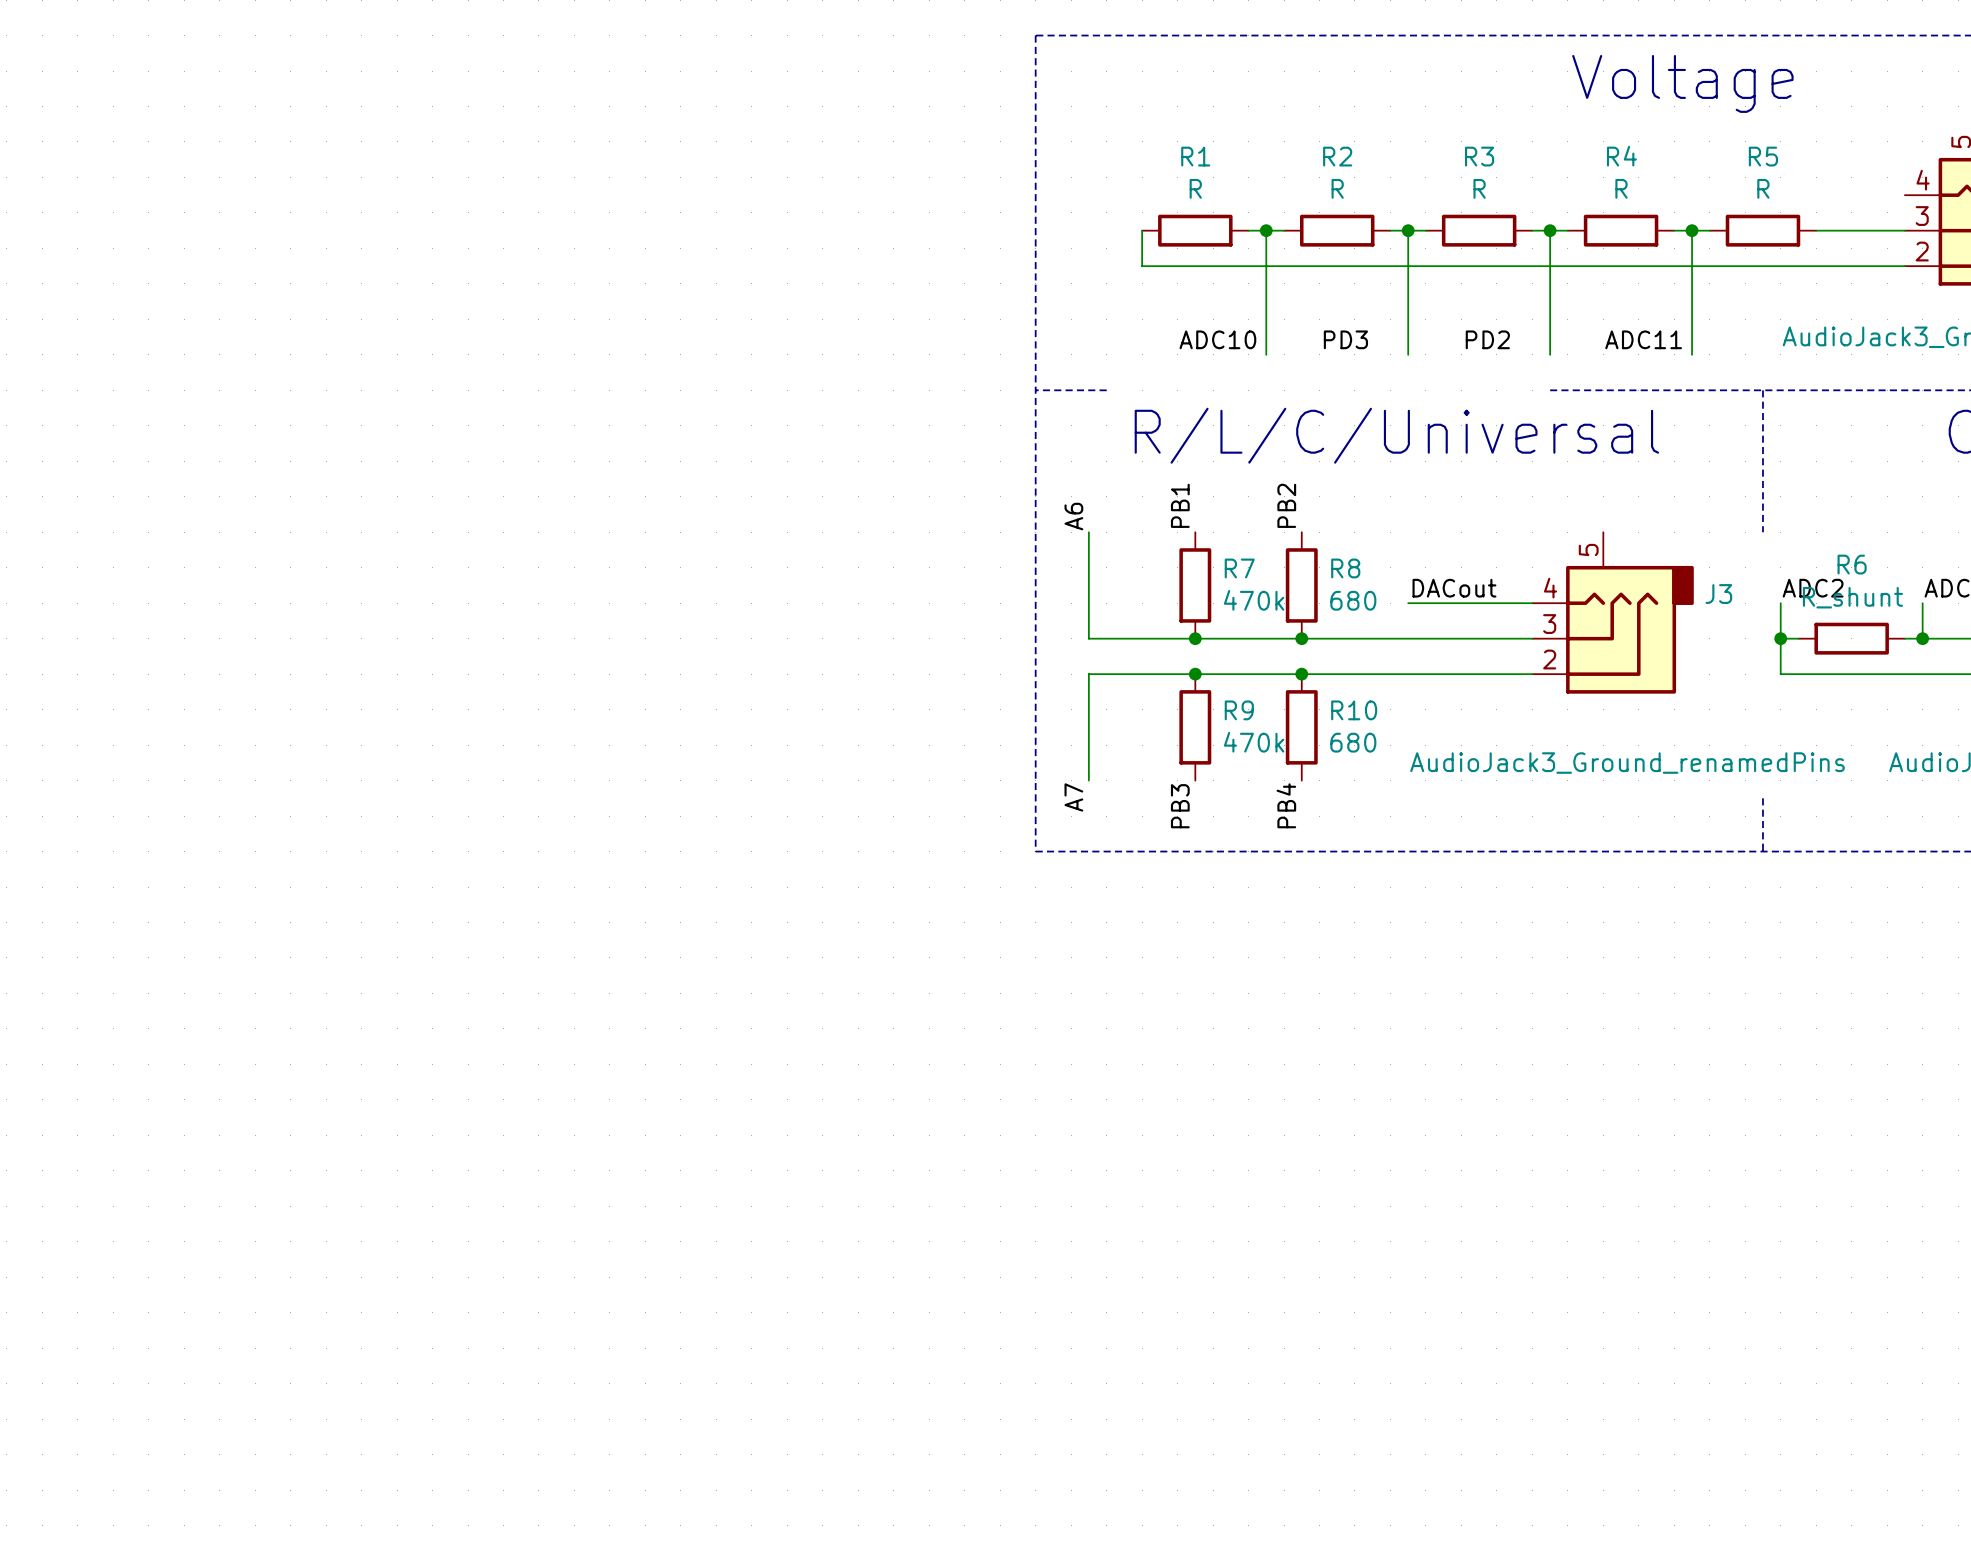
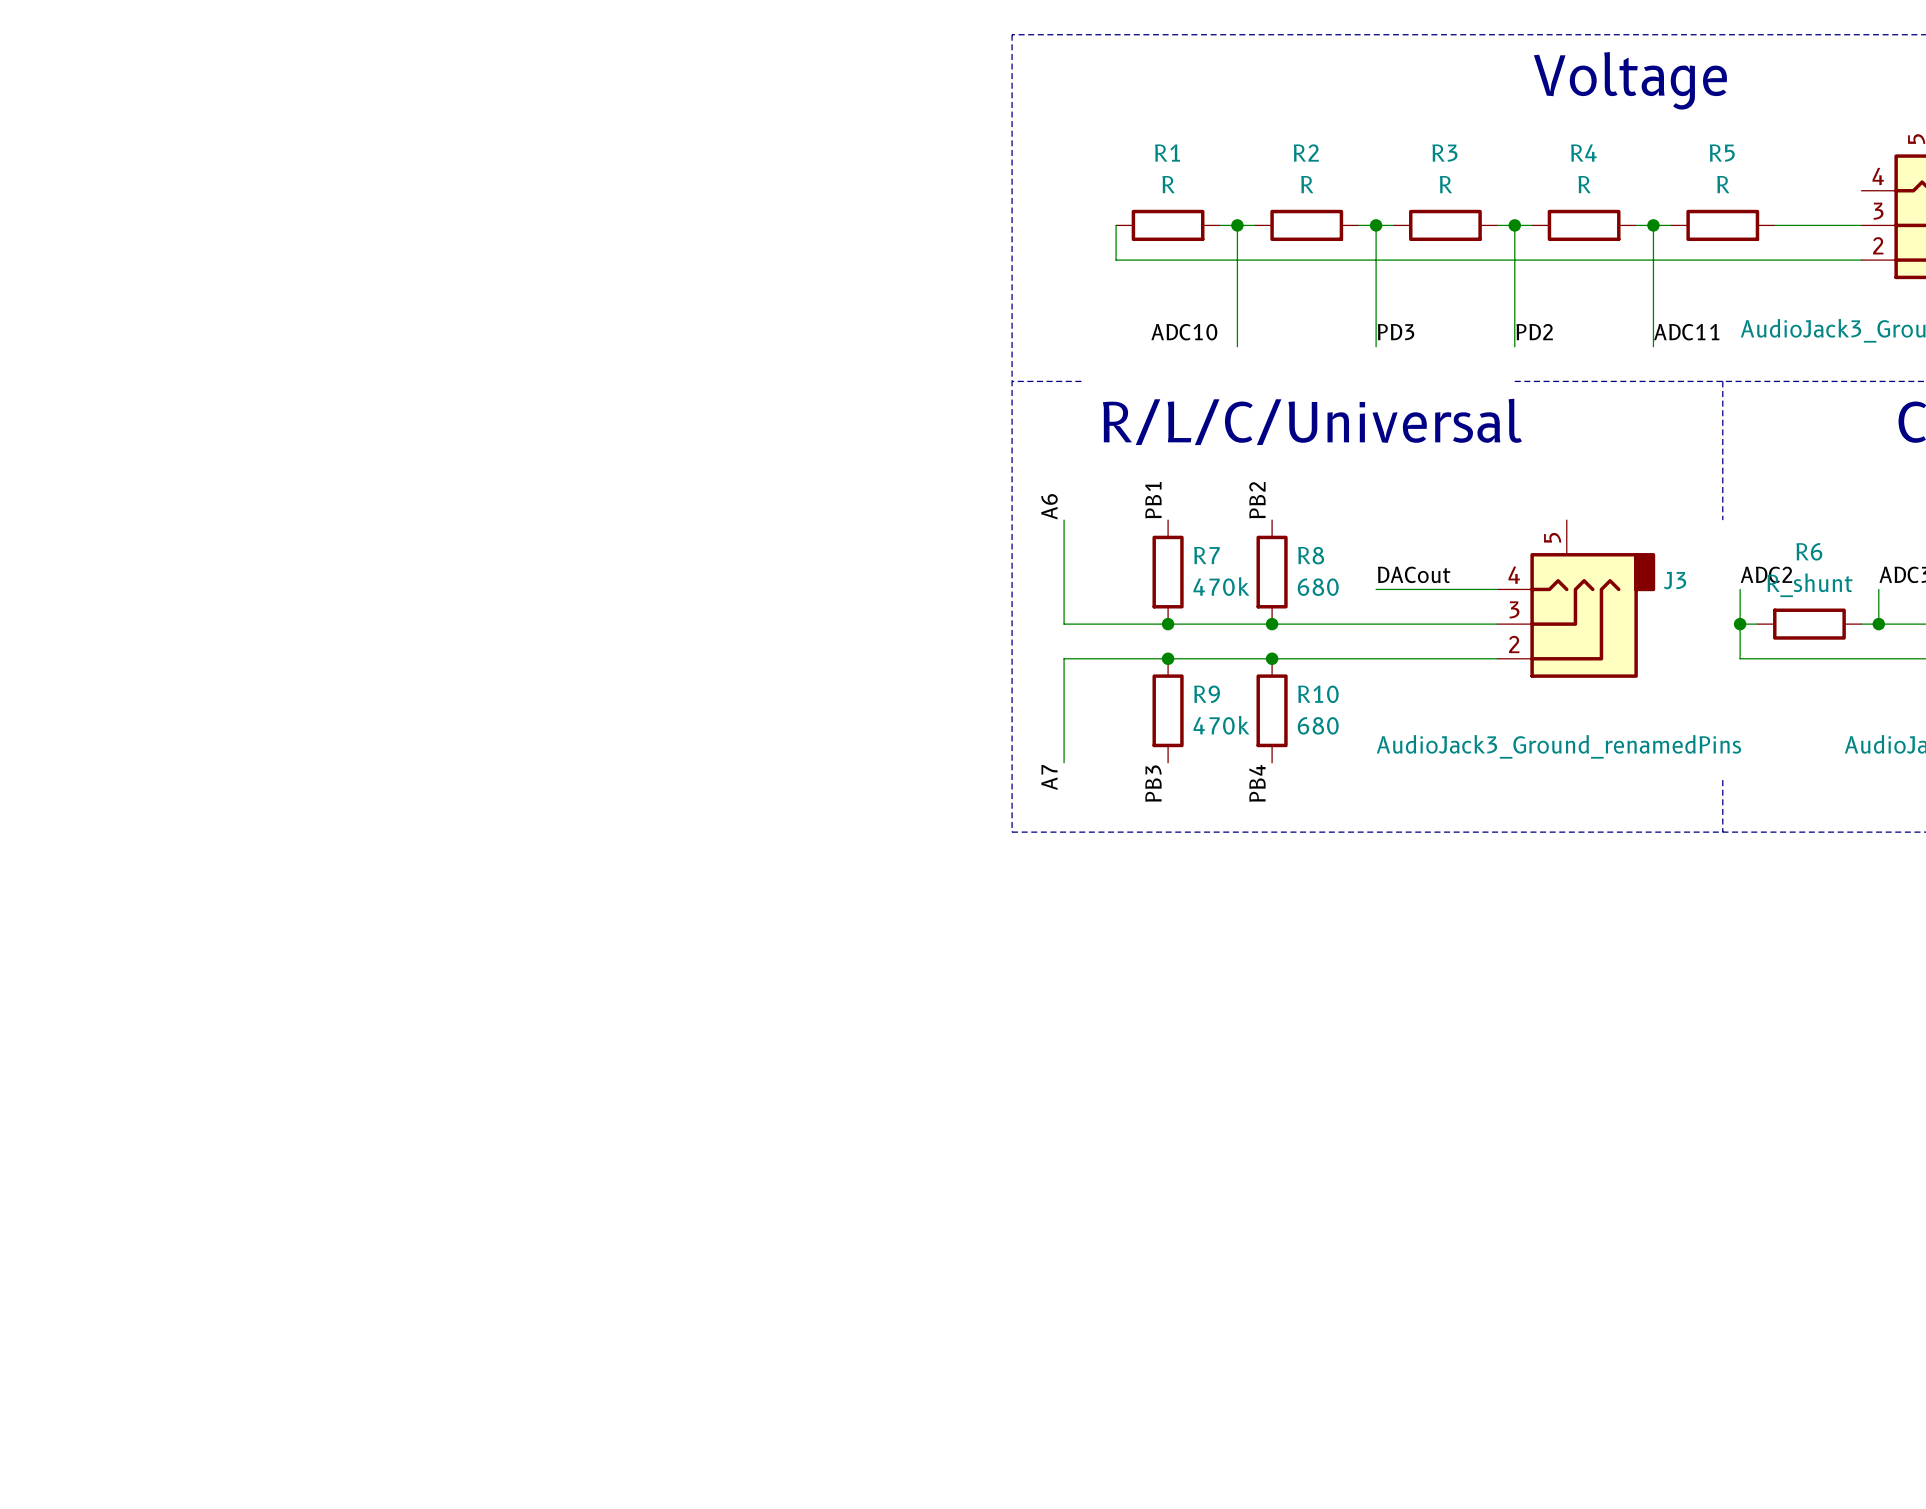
label position: PD3 (1345, 339) -> PD3 (1395, 332)
label position: PD2 (1487, 339) -> PD2 (1534, 332)
label position: ADC11 (1643, 339) -> ADC11 (1686, 332)

